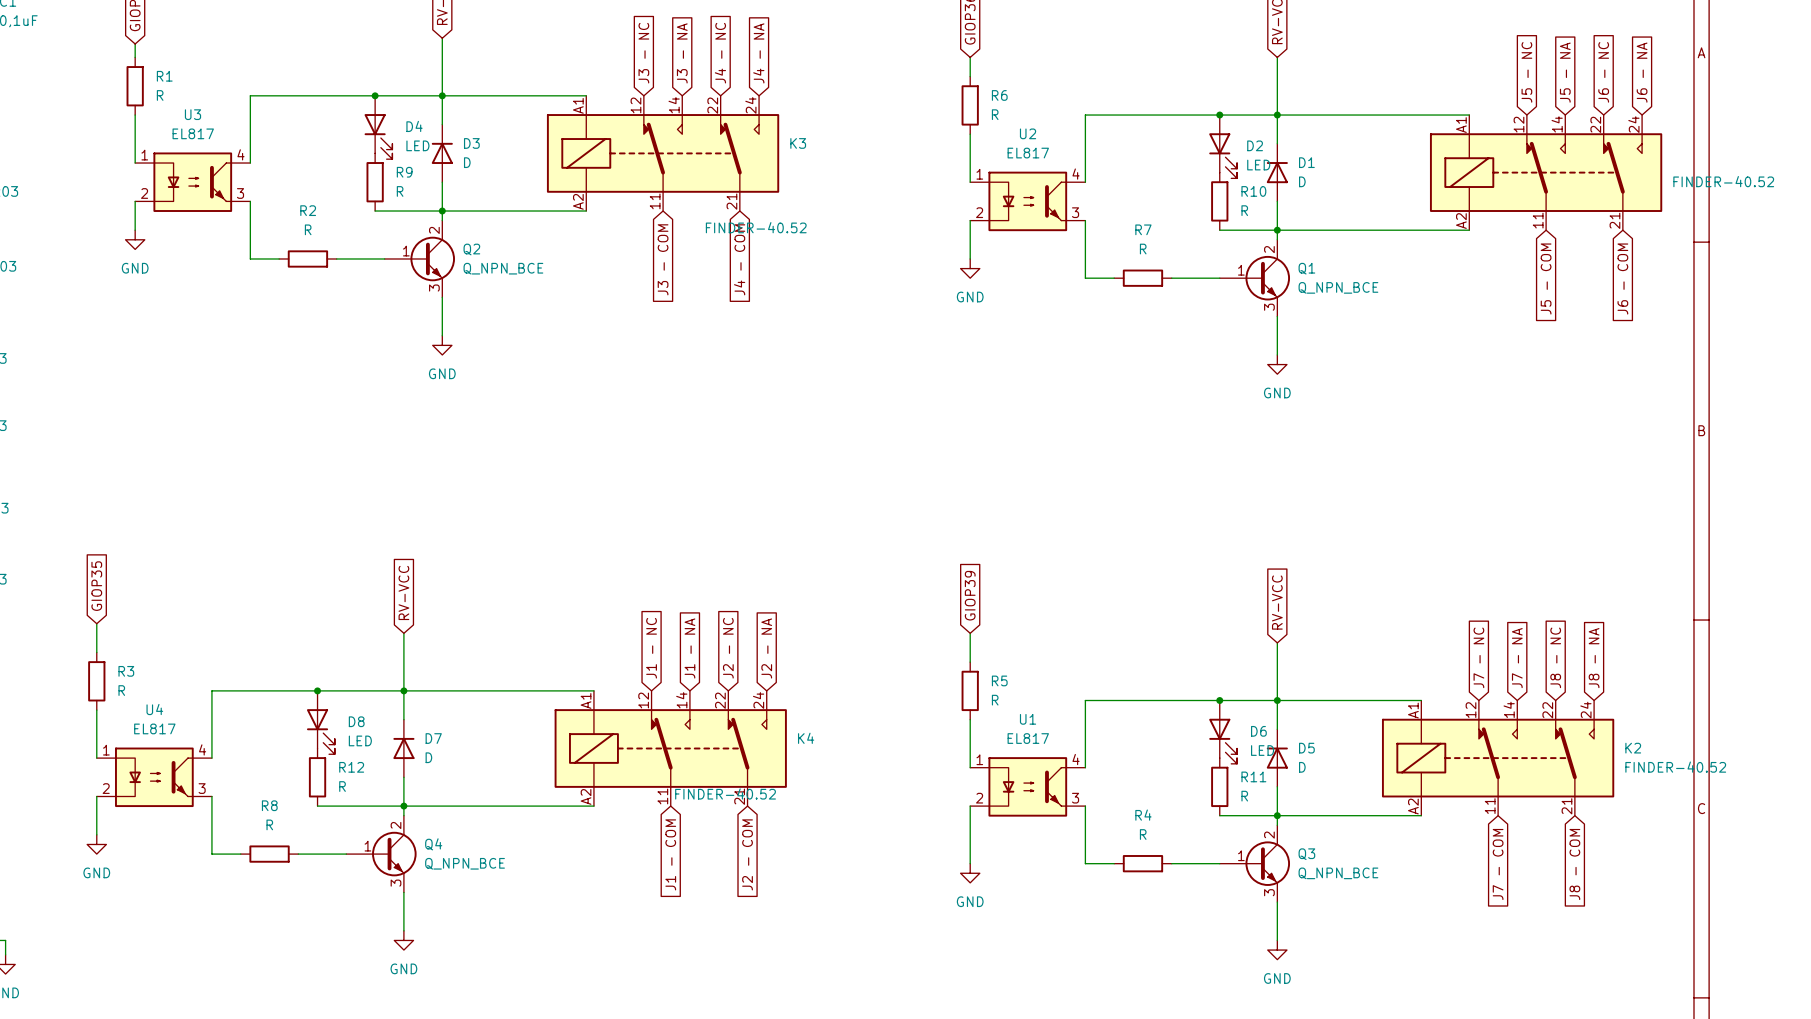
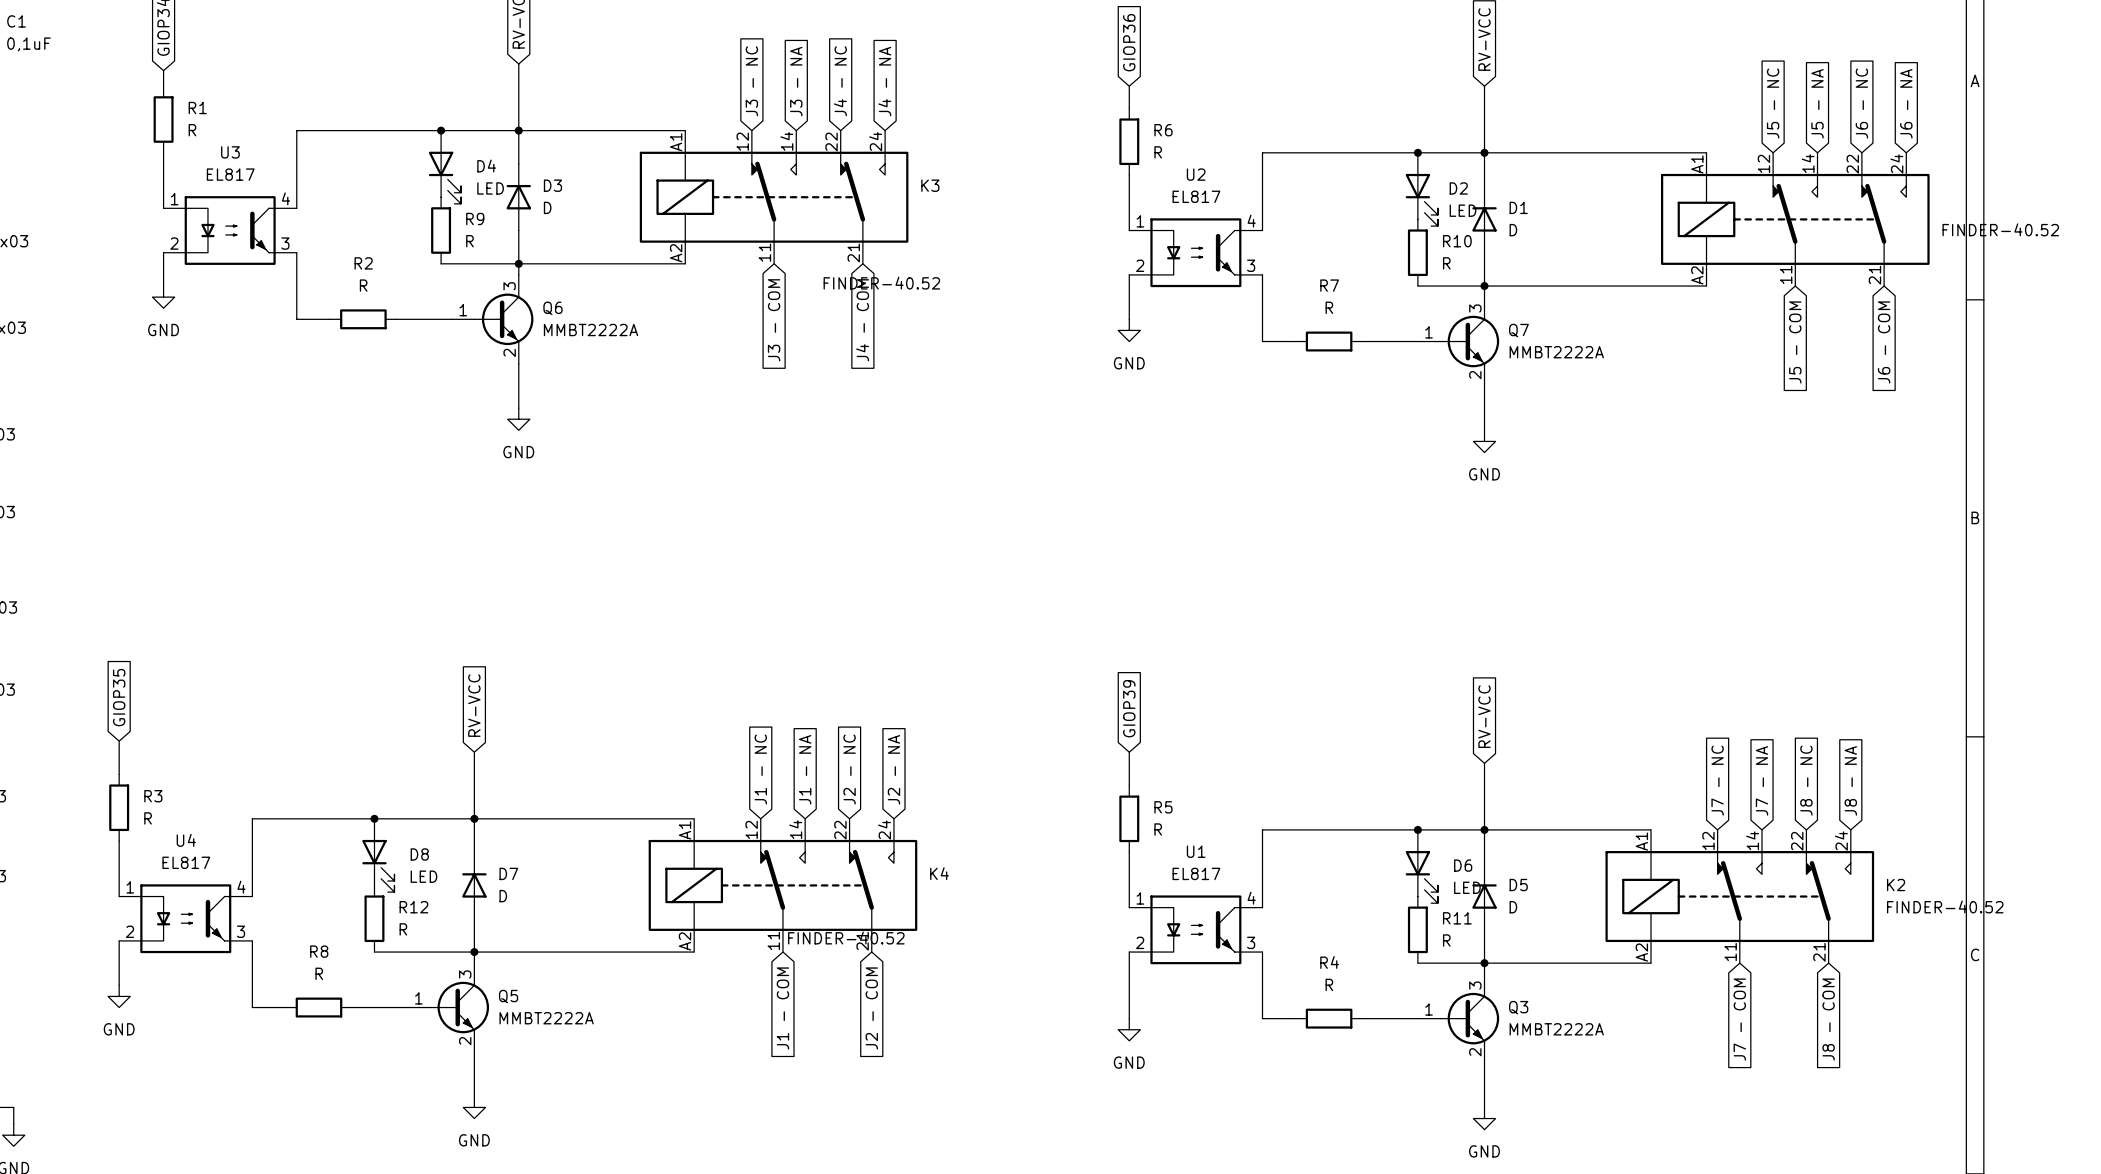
Q2: Q_NPN_BCE (419, 258) -> none
Q6: none -> MMBT2222A (492, 319)
Q1: Q_NPN_BCE (1254, 278) -> none
Q7: none -> MMBT2222A (1458, 341)
Q3 symbol: [1219, 825, 1291, 903] -> [1417, 974, 1500, 1064]
Q4: Q_NPN_BCE (381, 854) -> none
Q5: none -> MMBT2222A (448, 1007)
Q3 value: Q_NPN_BCE (1338, 873) -> MMBT2222A (1556, 1029)

